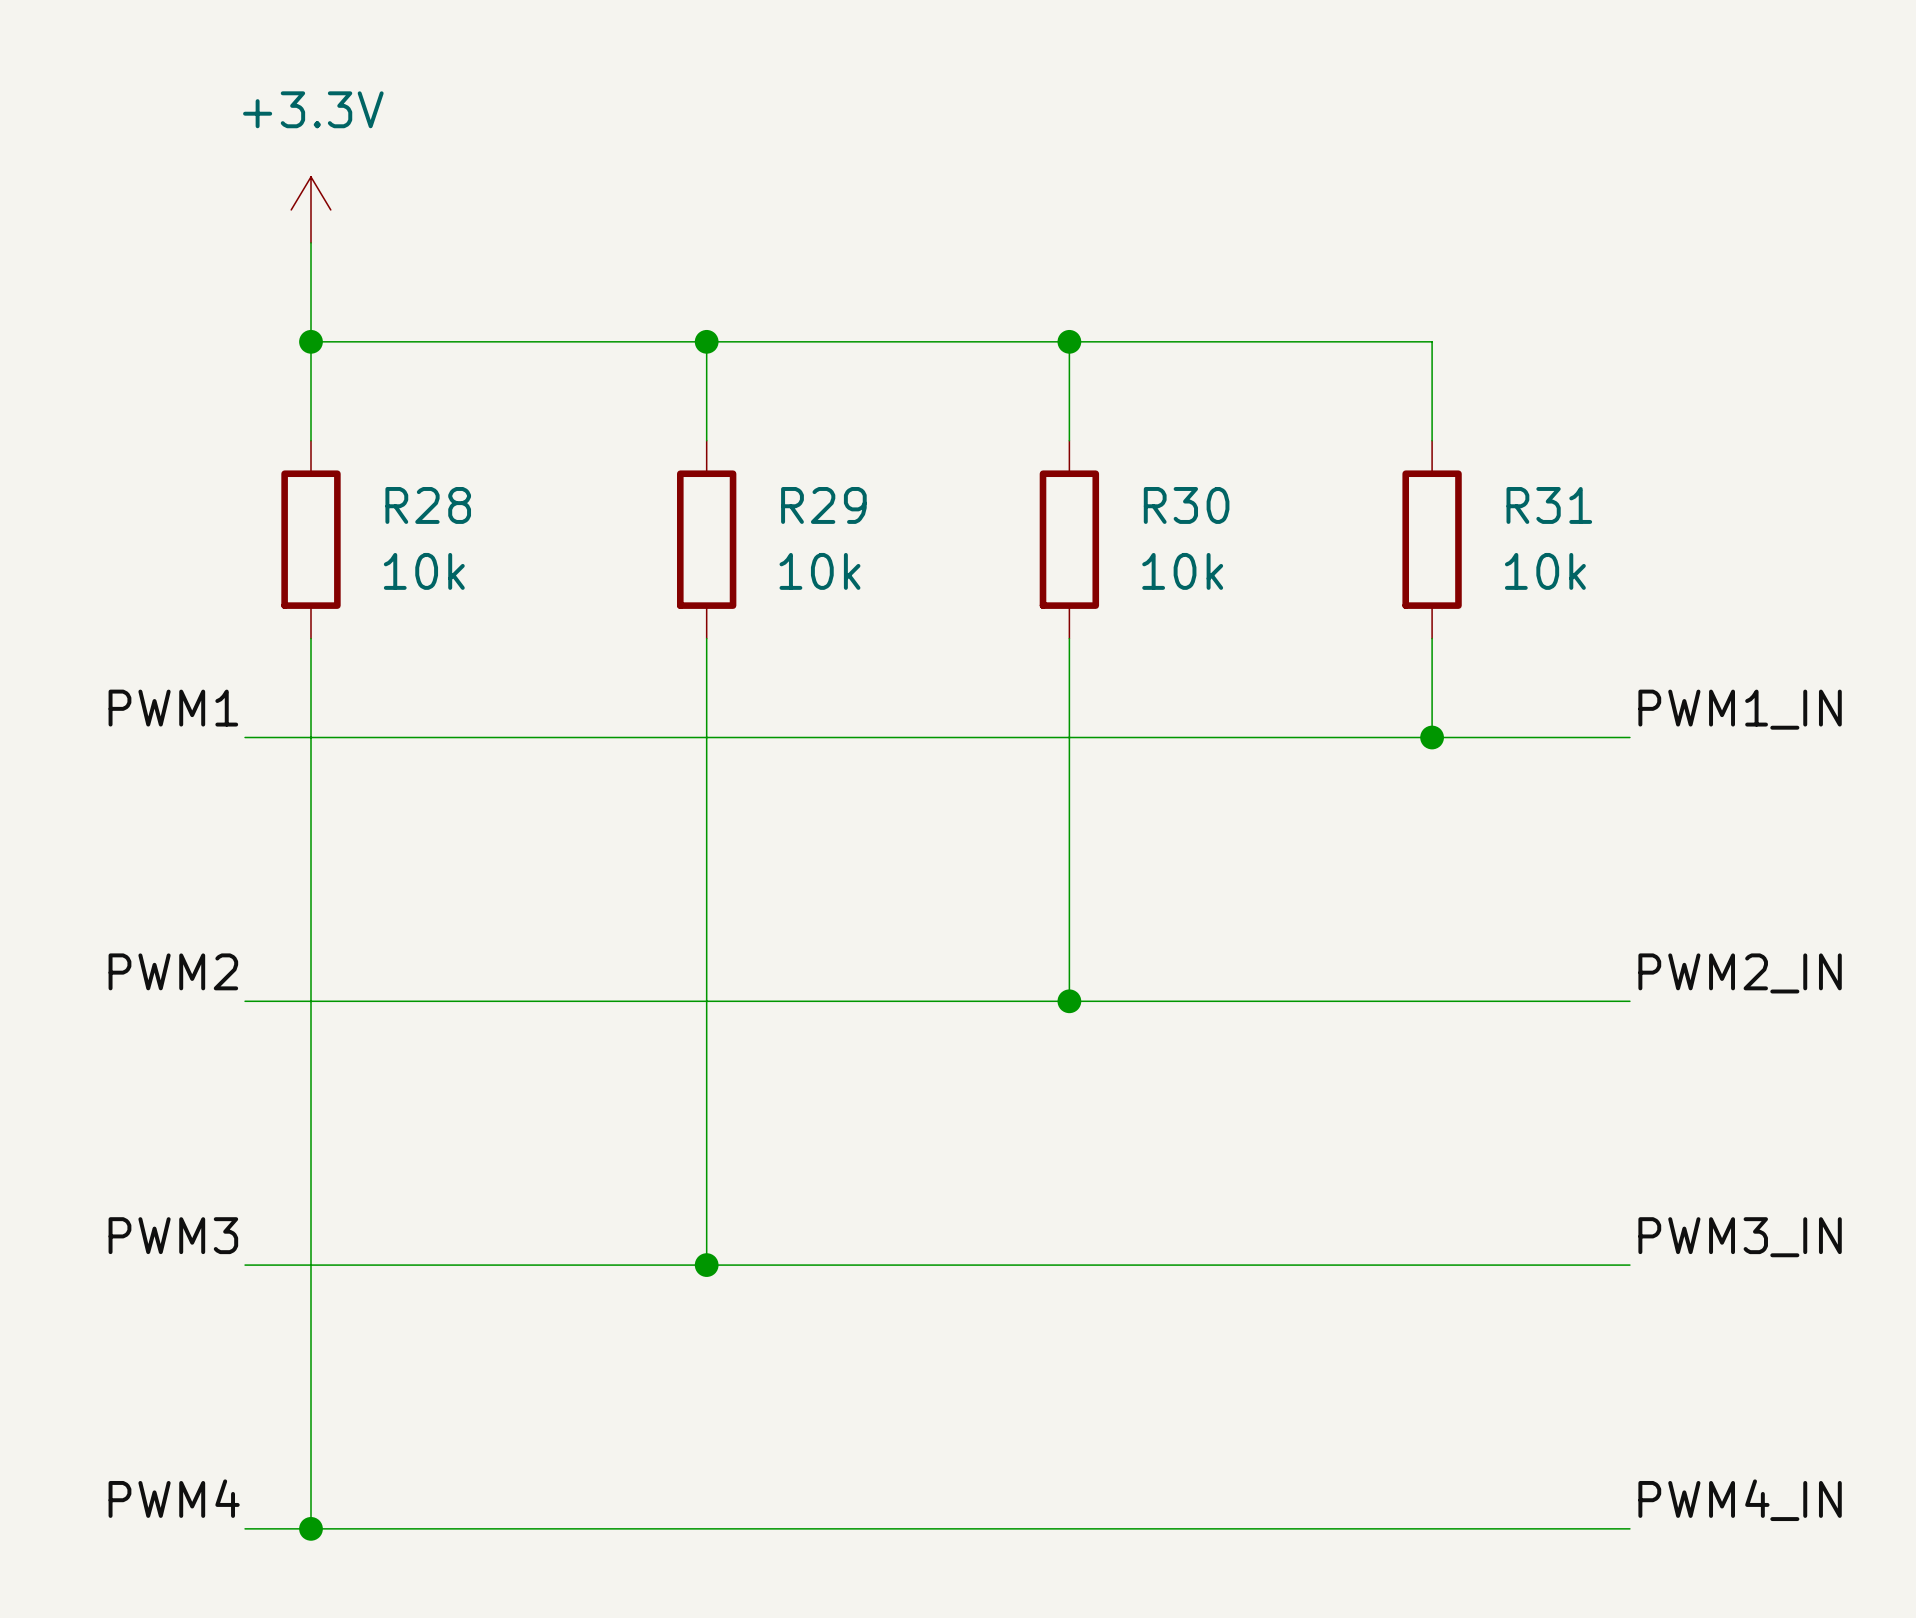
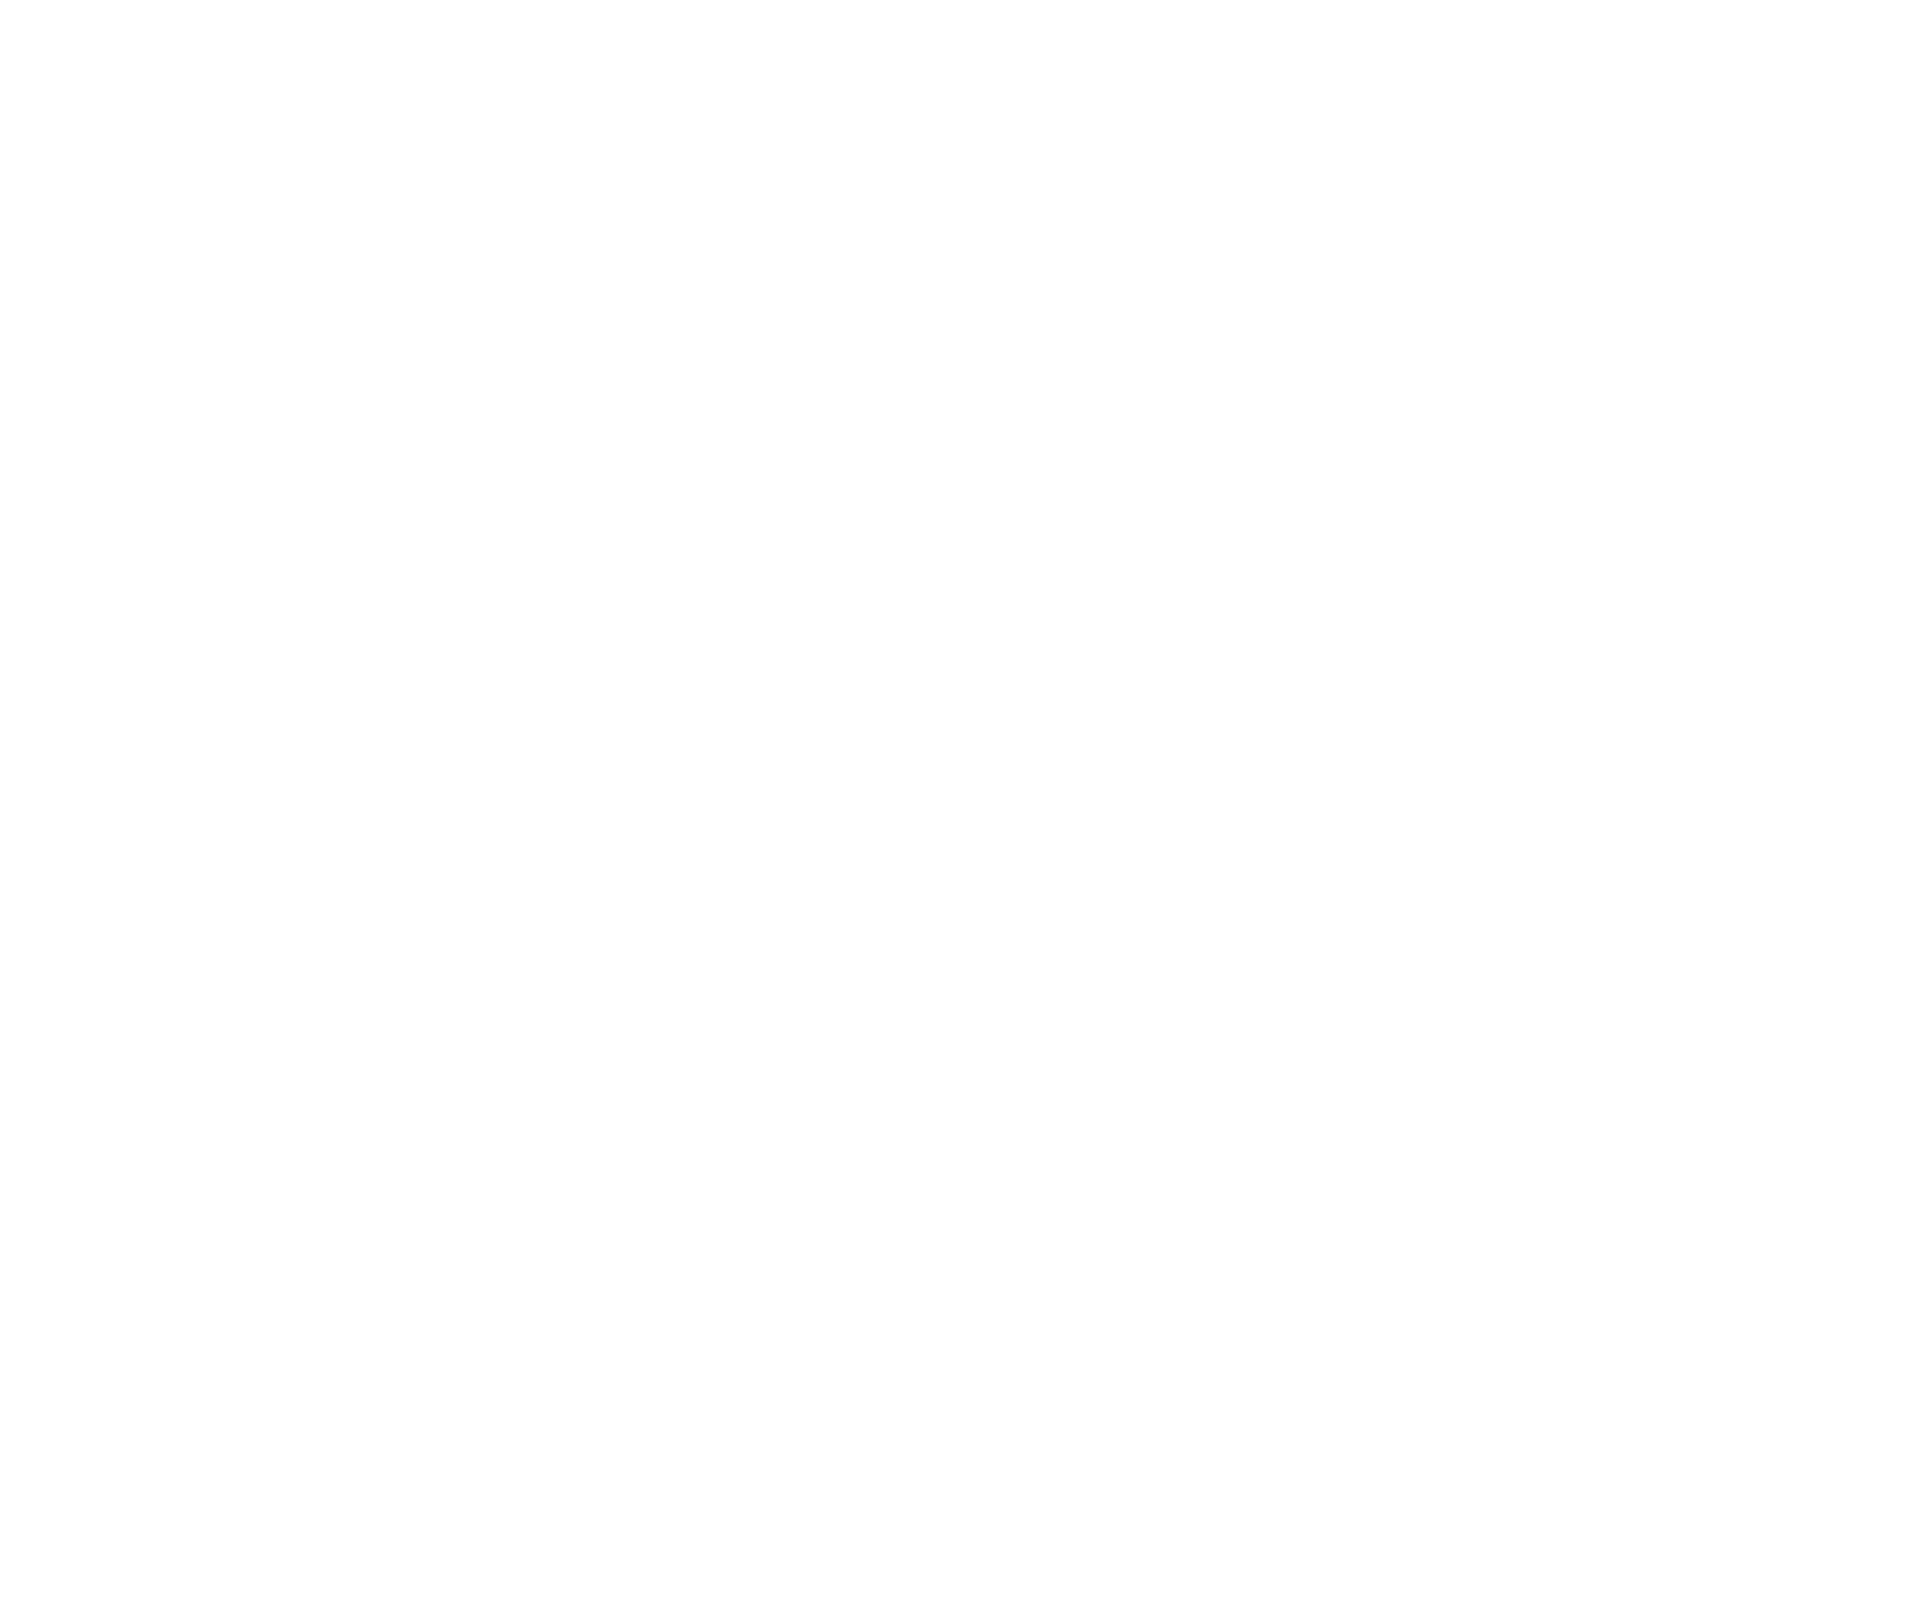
power symbol: +3.3V (311, 209) -> none
wire: (311, 242) (311, 440) -> none
wire: (311, 341) (1432, 341) (1432, 440) -> none
junction: (311, 341) -> none
wire: (706, 341) (706, 440) -> none
junction: (706, 341) -> none
wire: (1069, 341) (1069, 440) -> none
junction: (1069, 341) -> none
R28: 10k (311, 539) -> none
R29: 10k (706, 539) -> none
R30: 10k (1069, 539) -> none
R31: 10k (1432, 539) -> none
wire: (311, 638) (311, 1528) -> none
wire: (706, 638) (706, 1265) -> none
wire: (1069, 638) (1069, 1001) -> none
wire: (1432, 638) (1432, 737) -> none
label: PWM1 (173, 708) -> none
label: PWM1_IN (1740, 709) -> none
wire: (245, 737) (1629, 737) -> none
junction: (1432, 737) -> none
label: PWM2 (173, 971) -> none
label: PWM2_IN (1740, 973) -> none
wire: (245, 1001) (1629, 1001) -> none
junction: (1069, 1001) -> none
label: PWM3 (173, 1235) -> none
label: PWM3_IN (1740, 1237) -> none
wire: (245, 1265) (1629, 1265) -> none
junction: (706, 1265) -> none
label: PWM4 (174, 1498) -> none
label: PWM4_IN (1740, 1500) -> none
wire: (245, 1528) (1629, 1528) -> none
junction: (311, 1528) -> none

